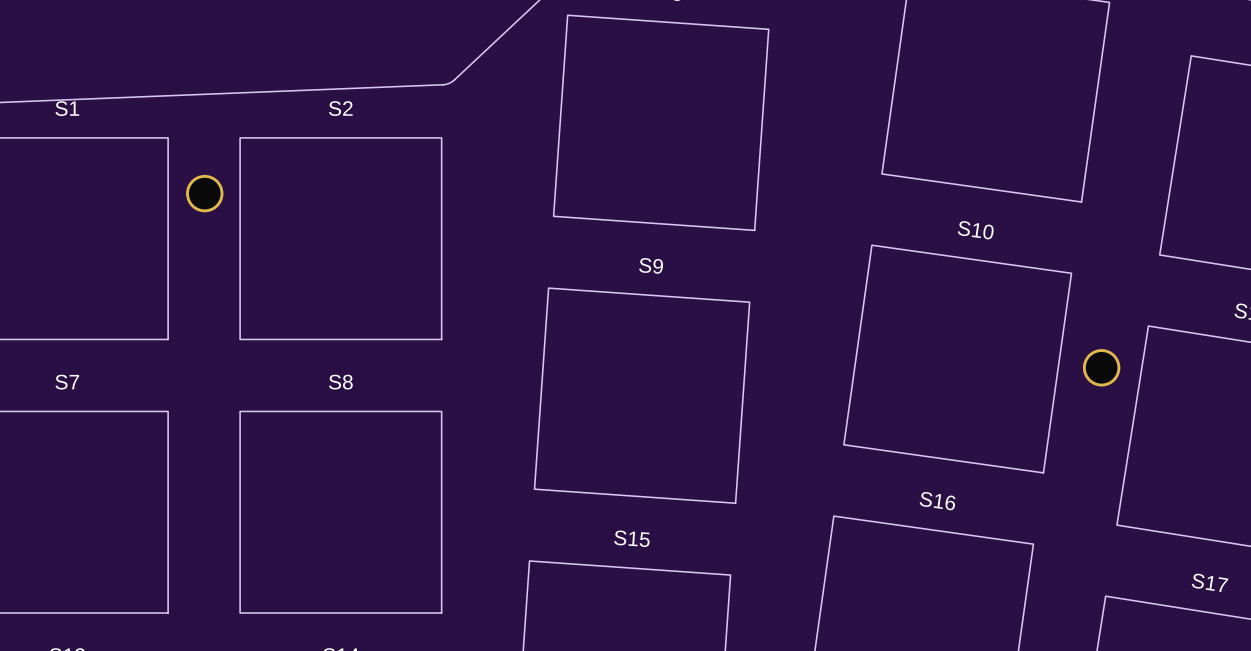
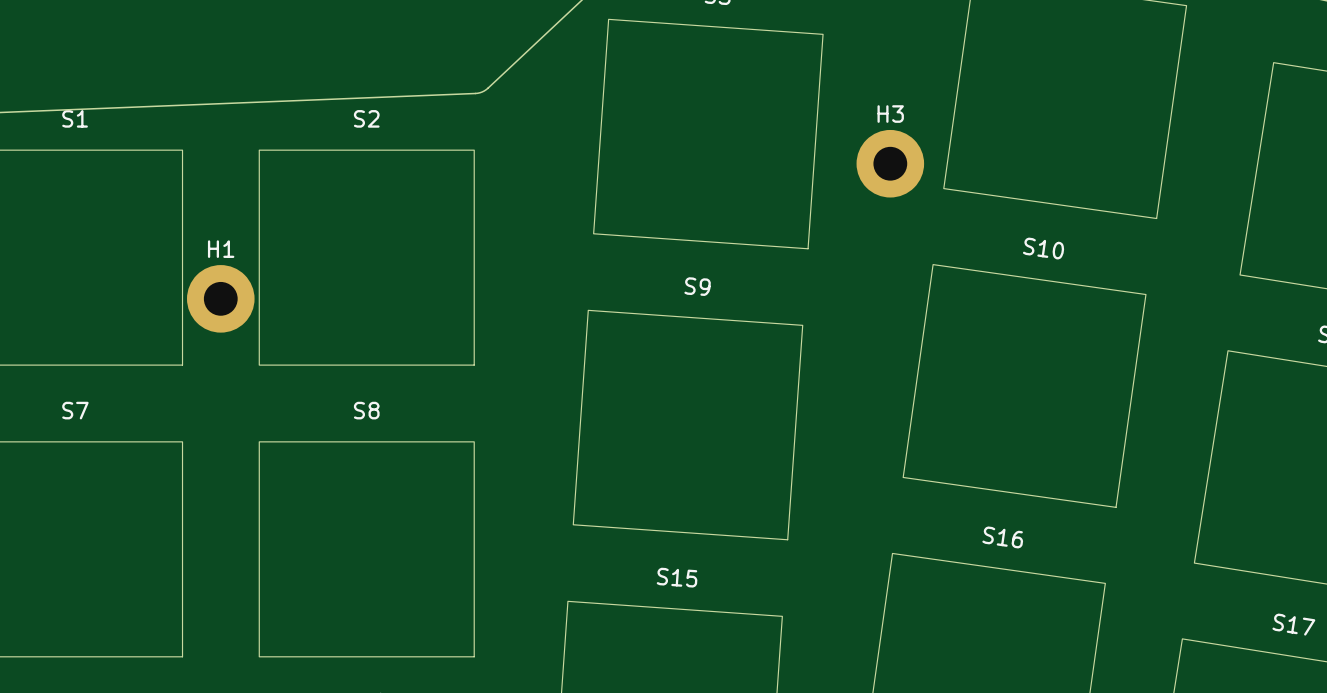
H3: none -> (890, 163)
part: (204, 193) -> none
H1: none -> (220, 298)
part: (1101, 367) -> none

